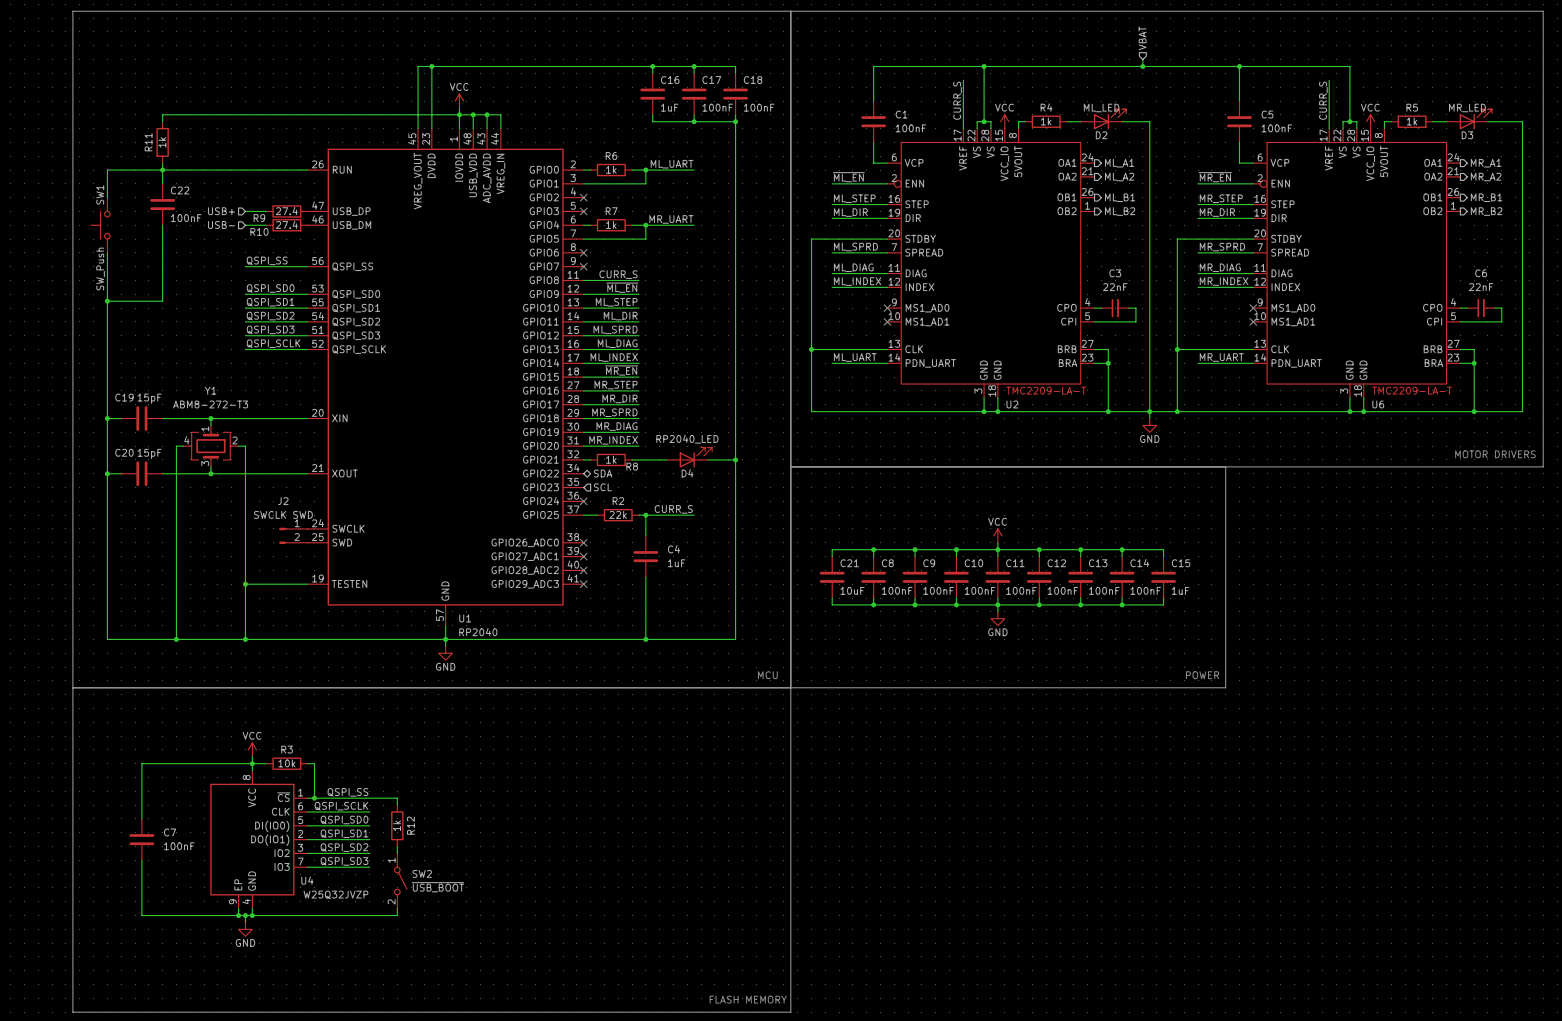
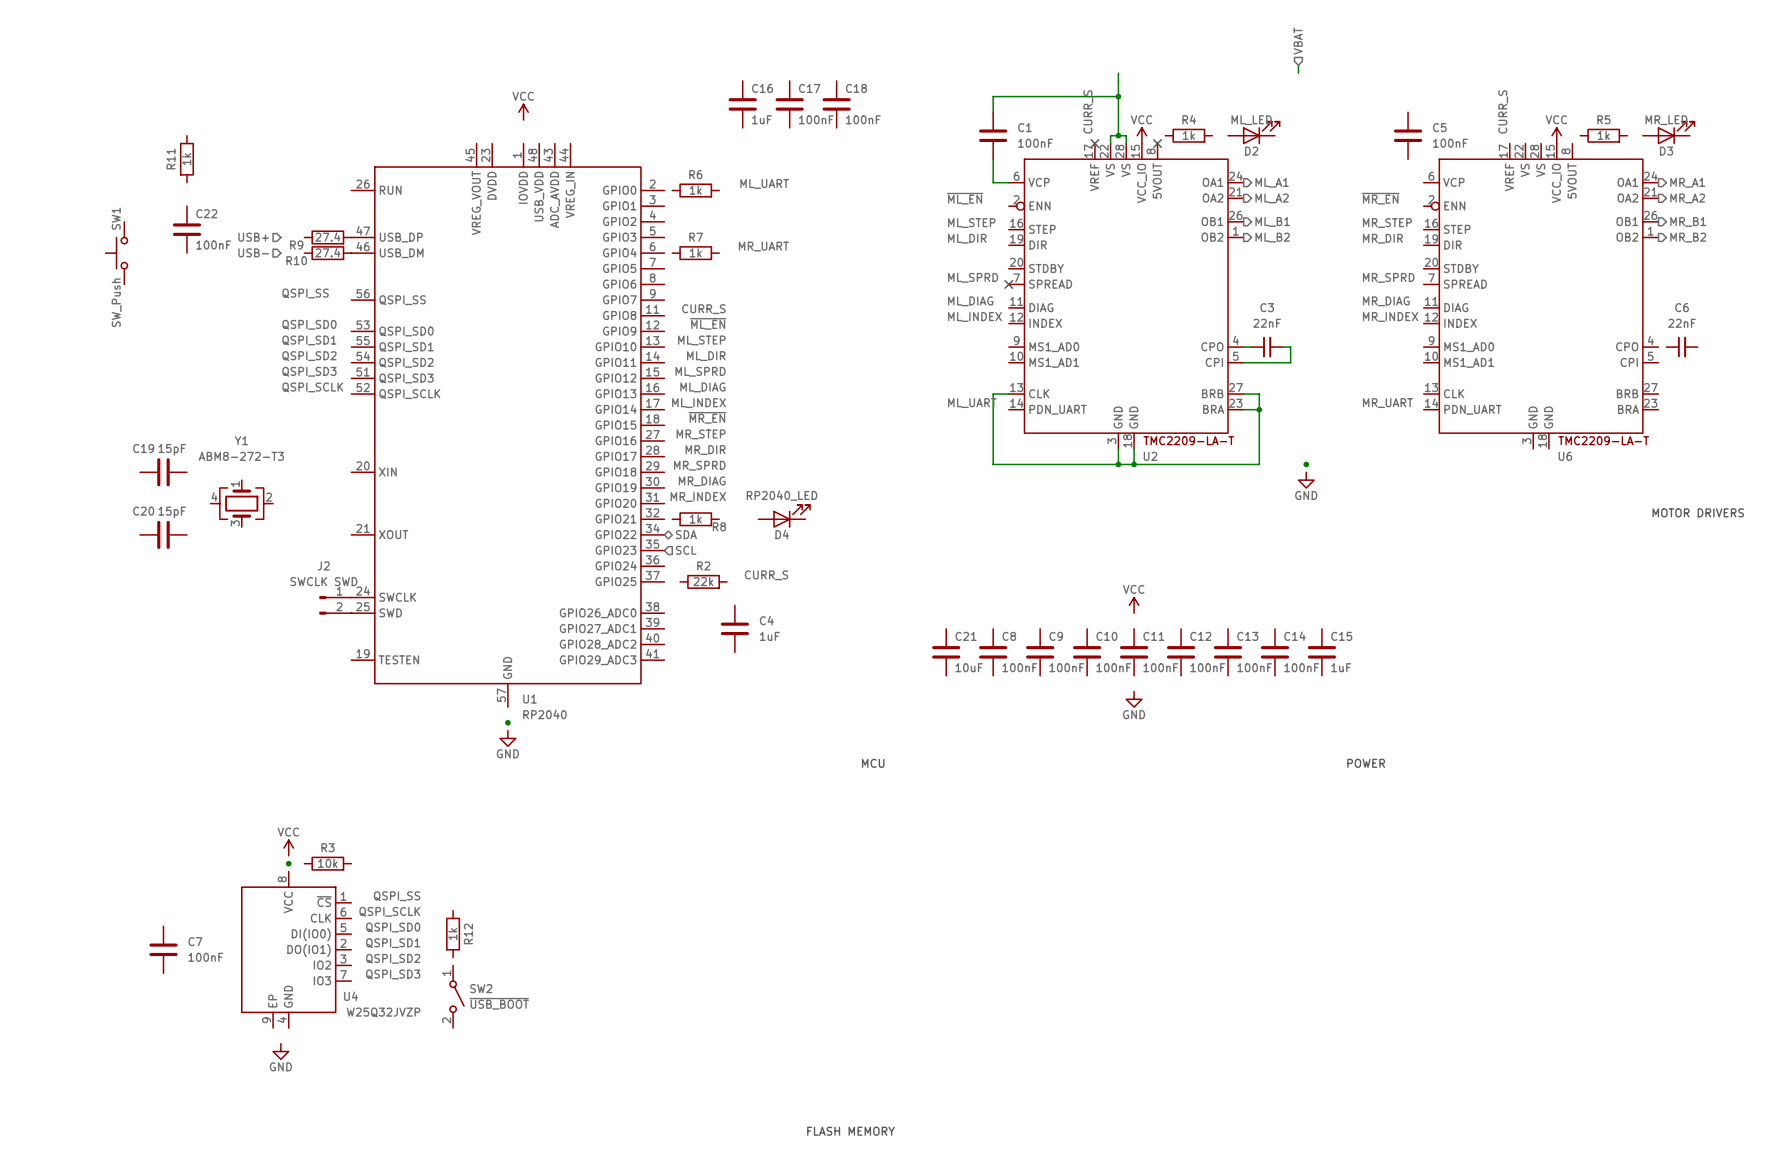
line: (790, 11) (790, 1012) (72, 1012) (72, 11) (1543, 11) (1543, 466) (790, 466) -> none
wire: (431, 66) (431, 128) -> none
junction: (431, 66) -> none
wire: (652, 66) (652, 73) -> none
junction: (652, 66) -> none
wire: (694, 66) (694, 73) -> none
junction: (694, 66) -> none
junction position: (984, 66) -> (1118, 96)
junction: (1142, 66) -> none
wire: (1239, 66) (1239, 101) -> none
junction: (1239, 66) -> none
wire: (735, 73) (735, 66) (418, 66) (418, 128) -> none
wire: (963, 80) (963, 128) -> none
wire: (1329, 80) (1329, 128) -> none
wire: (873, 87) (873, 66) (1349, 66) (1349, 121) -> (993, 96) (1118, 96)
wire: (459, 107) (459, 128) -> none
junction: (459, 114) -> none
wire: (473, 114) (473, 128) -> none
junction: (473, 114) -> none
wire: (487, 114) (487, 128) -> none
junction: (487, 114) -> none
wire: (652, 114) (652, 121) (735, 121) -> none
wire: (694, 114) (694, 121) -> none
wire: (735, 114) (735, 639) (107, 639) (107, 252) -> none
wire: (162, 121) (162, 114) (500, 114) (500, 128) -> none
junction: (694, 121) -> none
junction: (735, 121) -> none
wire: (1025, 121) (1018, 121) (1018, 128) -> none
wire: (1066, 121) (1080, 121) -> none
wire: (1122, 121) (1149, 121) (1149, 418) -> none
junction: (1349, 121) -> none
wire: (1391, 121) (1384, 121) (1384, 128) -> none
wire: (1432, 121) (1446, 121) -> none
wire: (1487, 121) (1522, 121) (1522, 411) (1108, 411) -> none
no-connect mark: none -> (1094, 143)
no-connect mark: none -> (1157, 143)
wire: (1343, 128) (1343, 121) (1356, 121) (1356, 128) -> none
wire: (1239, 142) (1239, 163) (1253, 163) -> none
wire: (162, 163) (162, 183) -> none
junction: (162, 170) -> none
wire: (307, 170) (107, 170) (107, 197) -> none
wire: (583, 170) (590, 170) -> none
wire: (632, 170) (694, 170) -> none
wire: (645, 170) (645, 183) (583, 183) -> none
junction: (645, 170) -> none
wire: (832, 183) (887, 183) -> none
wire: (1198, 183) (1253, 183) -> none
no-connect mark: (583, 197) -> none
wire: (832, 204) (887, 204) -> none
wire: (1198, 204) (1253, 204) -> none
wire: (245, 211) (266, 211) -> none
no-connect mark: (583, 211) -> none
wire: (832, 218) (887, 218) -> none
wire: (1198, 218) (1253, 218) -> none
wire: (162, 225) (162, 301) (107, 301) -> none
wire: (245, 225) (266, 225) -> none
wire: (583, 225) (590, 225) -> none
wire: (632, 225) (694, 225) -> none
wire: (645, 225) (645, 239) (583, 239) -> none
junction: (645, 225) -> none
wire: (887, 239) (811, 239) (811, 411) (873, 411) -> none
wire: (1253, 239) (1177, 239) (1177, 411) -> none
no-connect mark: (583, 252) -> none
wire: (832, 252) (887, 252) -> none
no-connect mark: none -> (1008, 284)
wire: (1198, 252) (1253, 252) -> none
wire: (245, 266) (307, 266) -> none
no-connect mark: (583, 266) -> none
wire: (832, 273) (887, 273) -> none
wire: (1198, 273) (1253, 273) -> none
wire: (583, 280) (638, 280) -> none
wire: (832, 287) (887, 287) -> none
wire: (1198, 287) (1253, 287) -> none
wire: (245, 294) (307, 294) -> none
wire: (583, 294) (638, 294) -> none
junction: (107, 301) -> none
wire: (245, 308) (307, 308) -> none
wire: (583, 308) (638, 308) -> none
no-connect mark: (887, 308) -> none
no-connect mark: (1253, 308) -> none
wire: (1460, 308) (1467, 308) -> none
wire: (1494, 308) (1501, 308) (1501, 321) (1460, 321) -> none
wire: (245, 321) (307, 321) -> none
wire: (583, 321) (638, 321) -> none
no-connect mark: (887, 321) -> none
no-connect mark: (1253, 321) -> none
wire: (245, 335) (307, 335) -> none
wire: (583, 335) (638, 335) -> none
wire: (245, 349) (307, 349) -> none
wire: (583, 349) (638, 349) -> none
wire: (811, 349) (873, 349) -> (993, 464) (993, 394)
junction: (811, 349) -> none
wire: (1177, 349) (1253, 349) -> none
junction: (1177, 349) -> none
wire: (1460, 349) (1474, 349) (1474, 411) -> none
wire: (583, 363) (638, 363) -> none
wire: (832, 363) (887, 363) -> none
wire: (1198, 363) (1253, 363) -> none
wire: (1460, 363) (1474, 363) -> none
junction: (1474, 363) -> none
wire: (583, 377) (638, 377) -> none
wire: (583, 390) (638, 390) -> none
wire: (1349, 397) (1349, 411) -> none
wire: (1363, 397) (1363, 411) -> none
wire: (583, 404) (638, 404) -> none
junction: (1108, 411) -> none
junction: (1177, 411) -> none
junction: (1349, 411) -> none
junction: (1363, 411) -> none
junction: (1474, 411) -> none
wire: (107, 418) (121, 418) -> none
junction: (107, 418) -> none
wire: (162, 418) (307, 418) -> none
wire: (210, 418) (210, 425) -> none
junction: (210, 418) -> none
wire: (583, 418) (638, 418) -> none
wire: (583, 432) (638, 432) -> none
wire: (183, 446) (176, 446) (176, 639) -> none
wire: (238, 446) (245, 446) (245, 639) -> none
wire: (583, 446) (638, 446) -> none
wire: (583, 459) (590, 459) -> none
wire: (632, 459) (666, 459) -> none
wire: (707, 459) (735, 459) -> none
junction: (735, 459) -> none
wire: (210, 466) (210, 473) -> none
line: (1225, 466) (1225, 687) (72, 687) -> none
wire: (107, 473) (121, 473) -> none
junction: (107, 473) -> none
wire: (162, 473) (307, 473) -> none
junction: (210, 473) -> none
no-connect mark: (583, 501) -> none
wire: (583, 515) (597, 515) -> none
wire: (638, 515) (694, 515) -> none
wire: (645, 515) (645, 535) -> none
junction: (645, 515) -> none
no-connect mark: (583, 542) -> none
wire: (997, 542) (997, 556) -> none
wire: (873, 549) (873, 556) -> none
junction: (873, 549) -> none
wire: (915, 549) (915, 556) -> none
junction: (915, 549) -> none
wire: (956, 549) (956, 556) -> none
junction: (956, 549) -> none
junction: (997, 549) -> none
wire: (1039, 549) (1039, 556) -> none
junction: (1039, 549) -> none
wire: (1080, 549) (1080, 556) -> none
junction: (1080, 549) -> none
wire: (1122, 549) (1122, 556) -> none
junction: (1122, 549) -> none
no-connect mark: (583, 556) -> none
wire: (832, 556) (832, 549) (1163, 549) (1163, 556) -> none
no-connect mark: (583, 570) -> none
wire: (645, 577) (645, 639) -> none
wire: (245, 584) (307, 584) -> none
junction: (245, 584) -> none
no-connect mark: (583, 584) -> none
wire: (832, 598) (832, 604) (1163, 604) (1163, 598) -> none
wire: (873, 598) (873, 604) -> none
wire: (915, 598) (915, 604) -> none
wire: (956, 598) (956, 604) -> none
wire: (997, 598) (997, 611) -> none
wire: (1039, 598) (1039, 604) -> none
wire: (1080, 598) (1080, 604) -> none
wire: (1122, 598) (1122, 604) -> none
junction: (873, 604) -> none
junction: (915, 604) -> none
junction: (956, 604) -> none
junction: (997, 604) -> none
junction: (1039, 604) -> none
junction: (1080, 604) -> none
junction: (1122, 604) -> none
wire: (445, 625) (445, 646) -> none
junction: (176, 639) -> none
junction: (245, 639) -> none
junction: (645, 639) -> none
wire: (252, 756) (252, 770) -> none
wire: (266, 763) (141, 763) (141, 818) -> none
wire: (307, 763) (314, 763) (314, 798) -> none
wire: (307, 798) (397, 798) (397, 805) -> none
junction: (314, 798) -> none
wire: (307, 812) (369, 812) -> none
wire: (307, 825) (369, 825) -> none
wire: (307, 839) (369, 839) -> none
wire: (397, 846) (397, 853) -> none
wire: (307, 853) (369, 853) -> none
wire: (141, 860) (141, 915) (397, 915) (397, 908) -> none
wire: (307, 867) (369, 867) -> none
wire: (238, 908) (238, 915) -> none
wire: (252, 908) (252, 915) -> none
junction: (238, 915) -> none
wire: (245, 915) (245, 922) -> none
junction: (245, 915) -> none
junction: (252, 915) -> none

